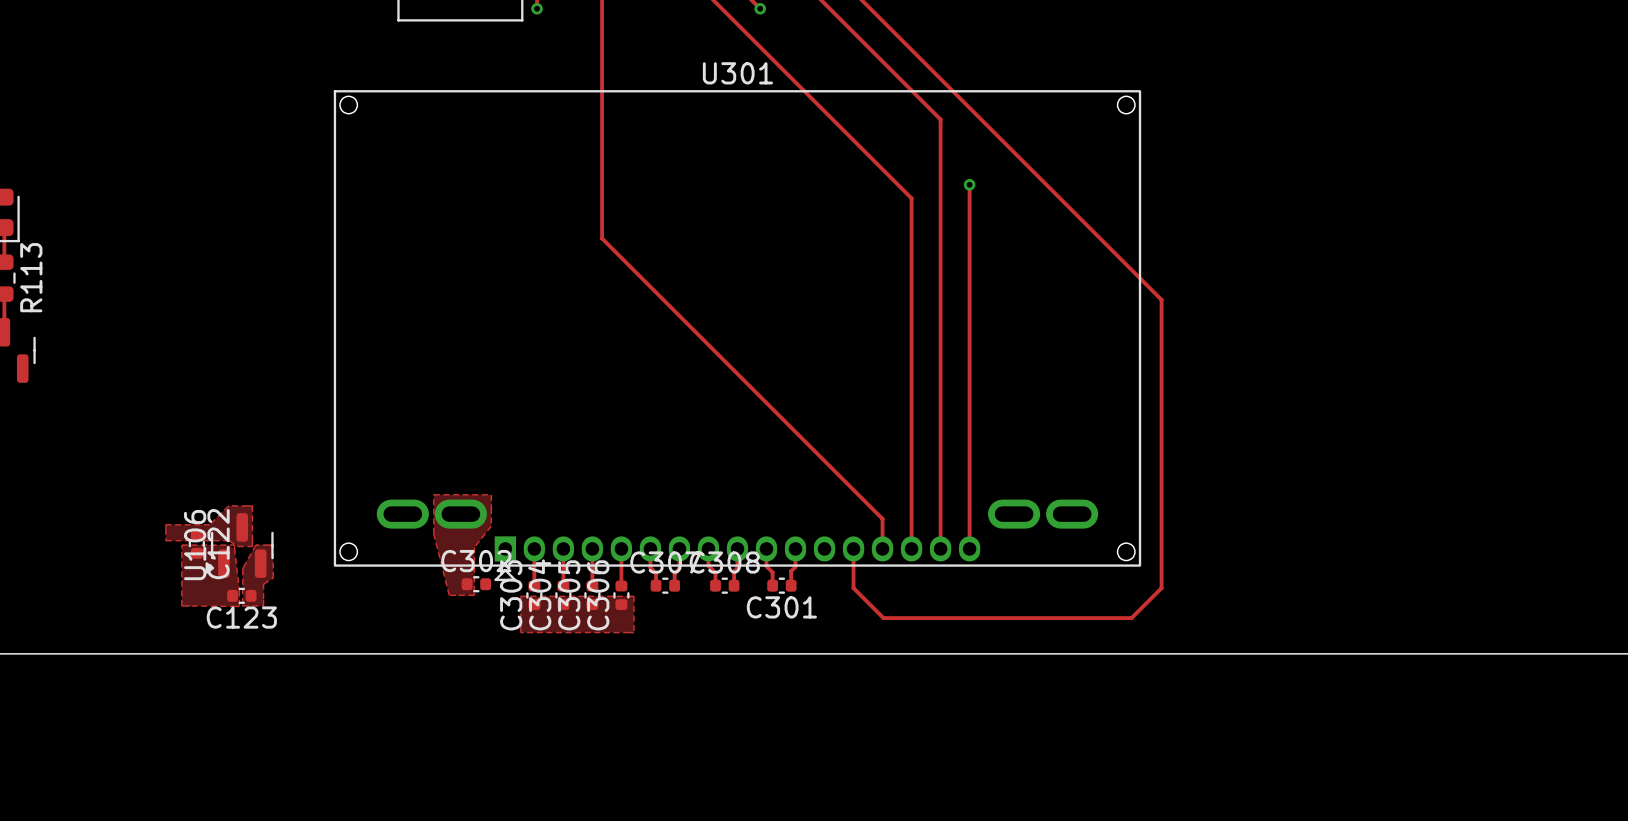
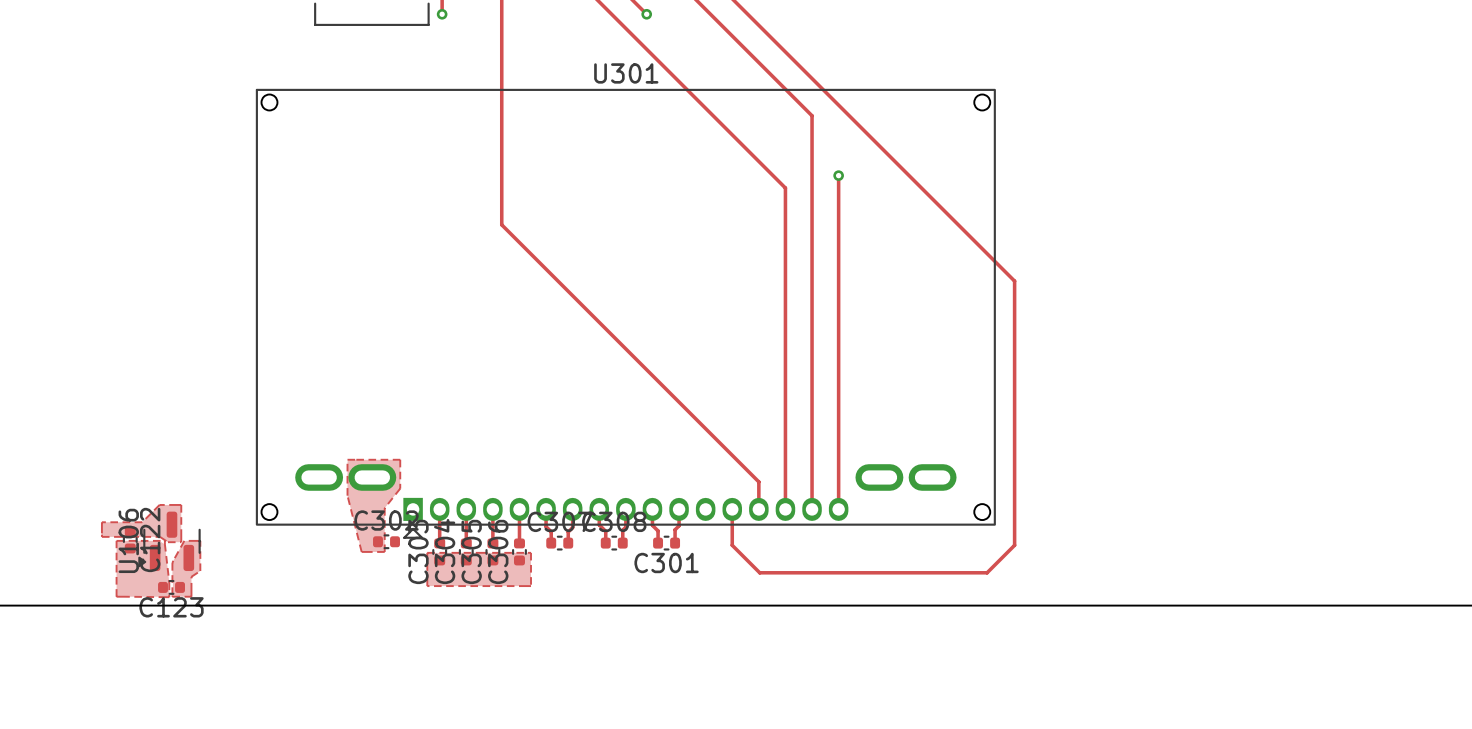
C122 position: (196, 544) -> (130, 539)
zone outline: (252, 544) (252, 505) (228, 505) (209, 524) (165, 524) (165, 540) (229, 540) (237, 546) (252, 546) -> (181, 504) (159, 504) (142, 522) (101, 522) (101, 536) (160, 536) (167, 542) (181, 542) (181, 507)
U106 position: (239, 545) -> (169, 541)
zone outline: (255, 545) (273, 545) (273, 577) (263, 584) (263, 605) (242, 605) (242, 569) (255, 545) -> (184, 540) (200, 540) (200, 571) (191, 576) (191, 596) (172, 596) (172, 563) (184, 540)
zone outline: (181, 583) (181, 545) (234, 545) (239, 606) (181, 605) -> (116, 540) (164, 540) (169, 597) (116, 596) (116, 561)
C123 position: (241, 595) -> (171, 587)

